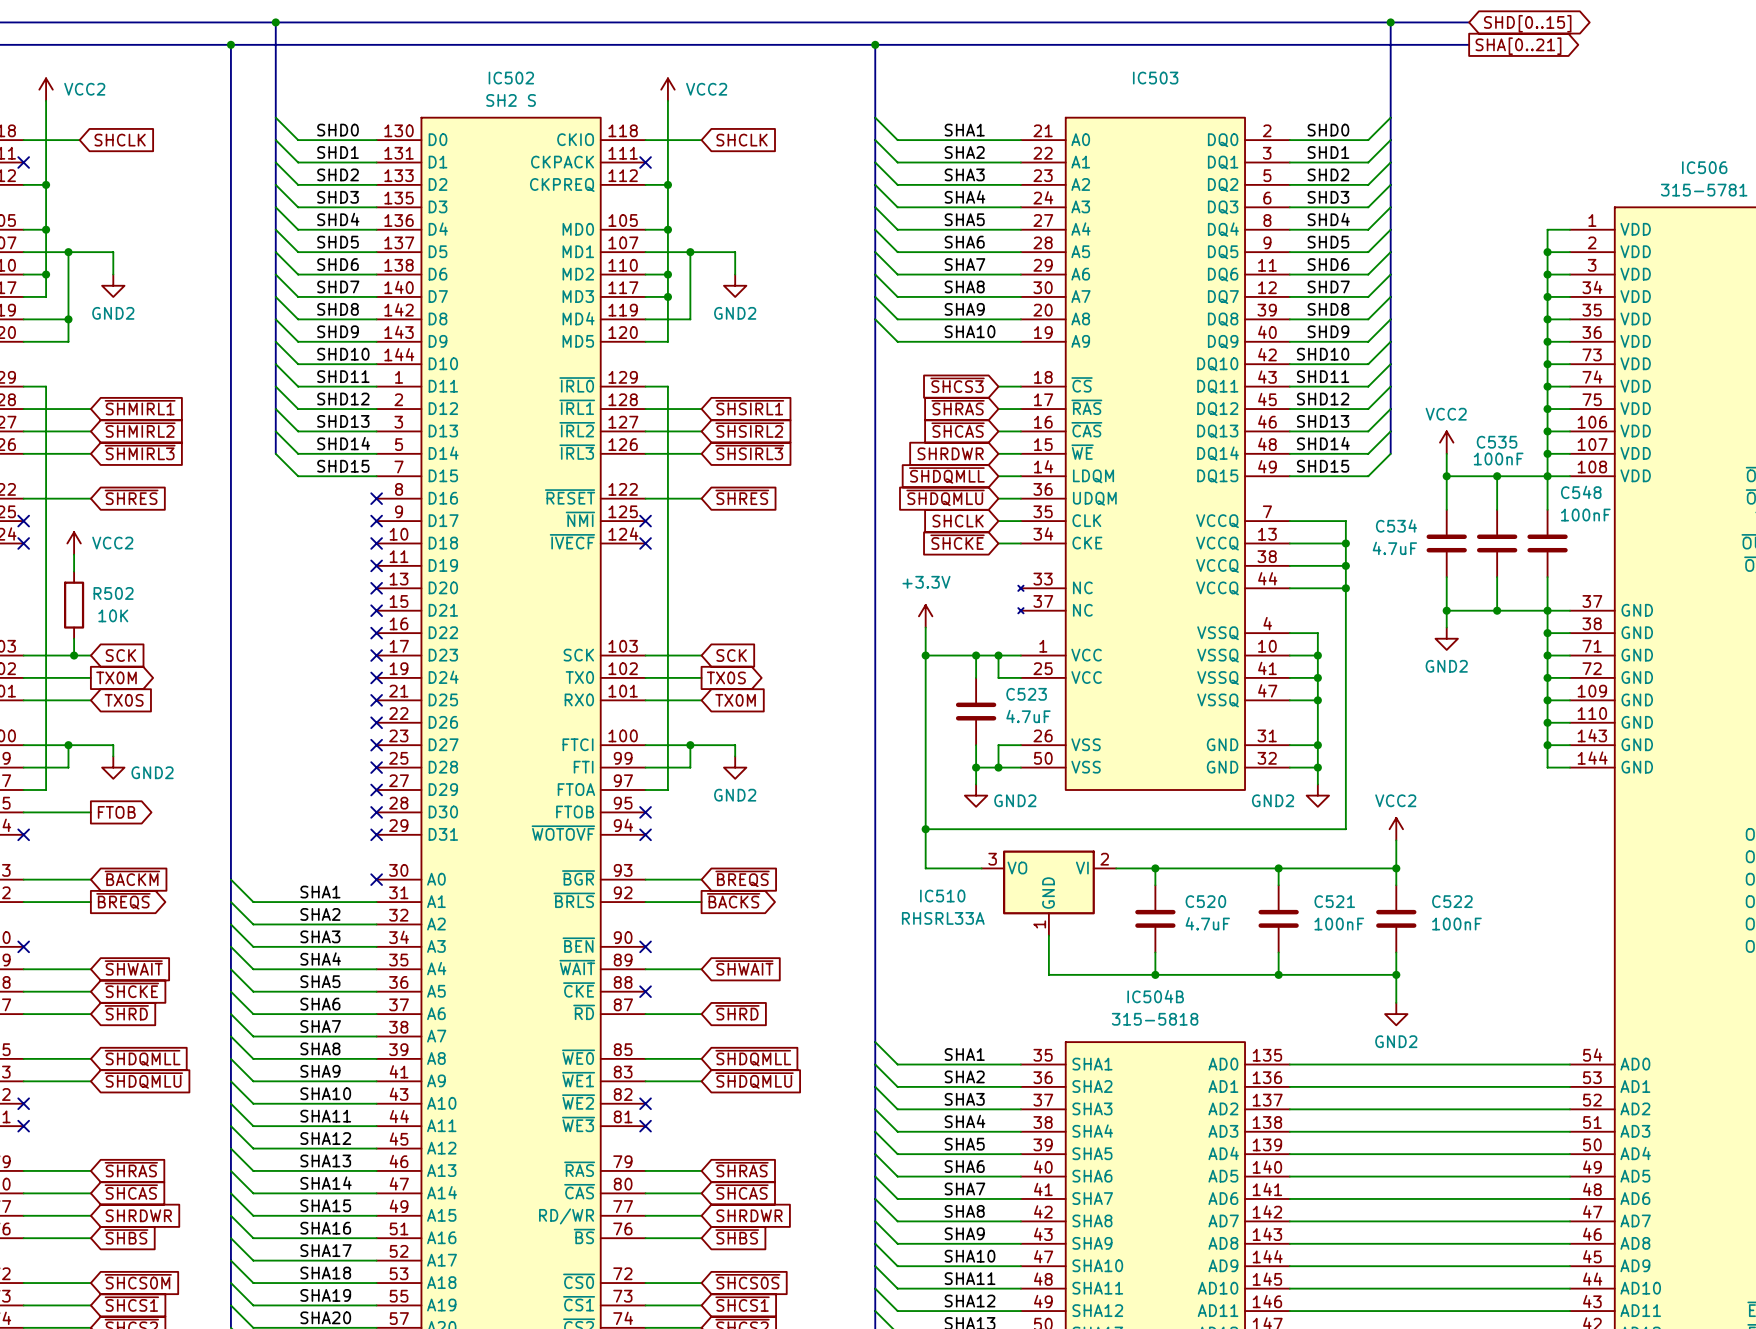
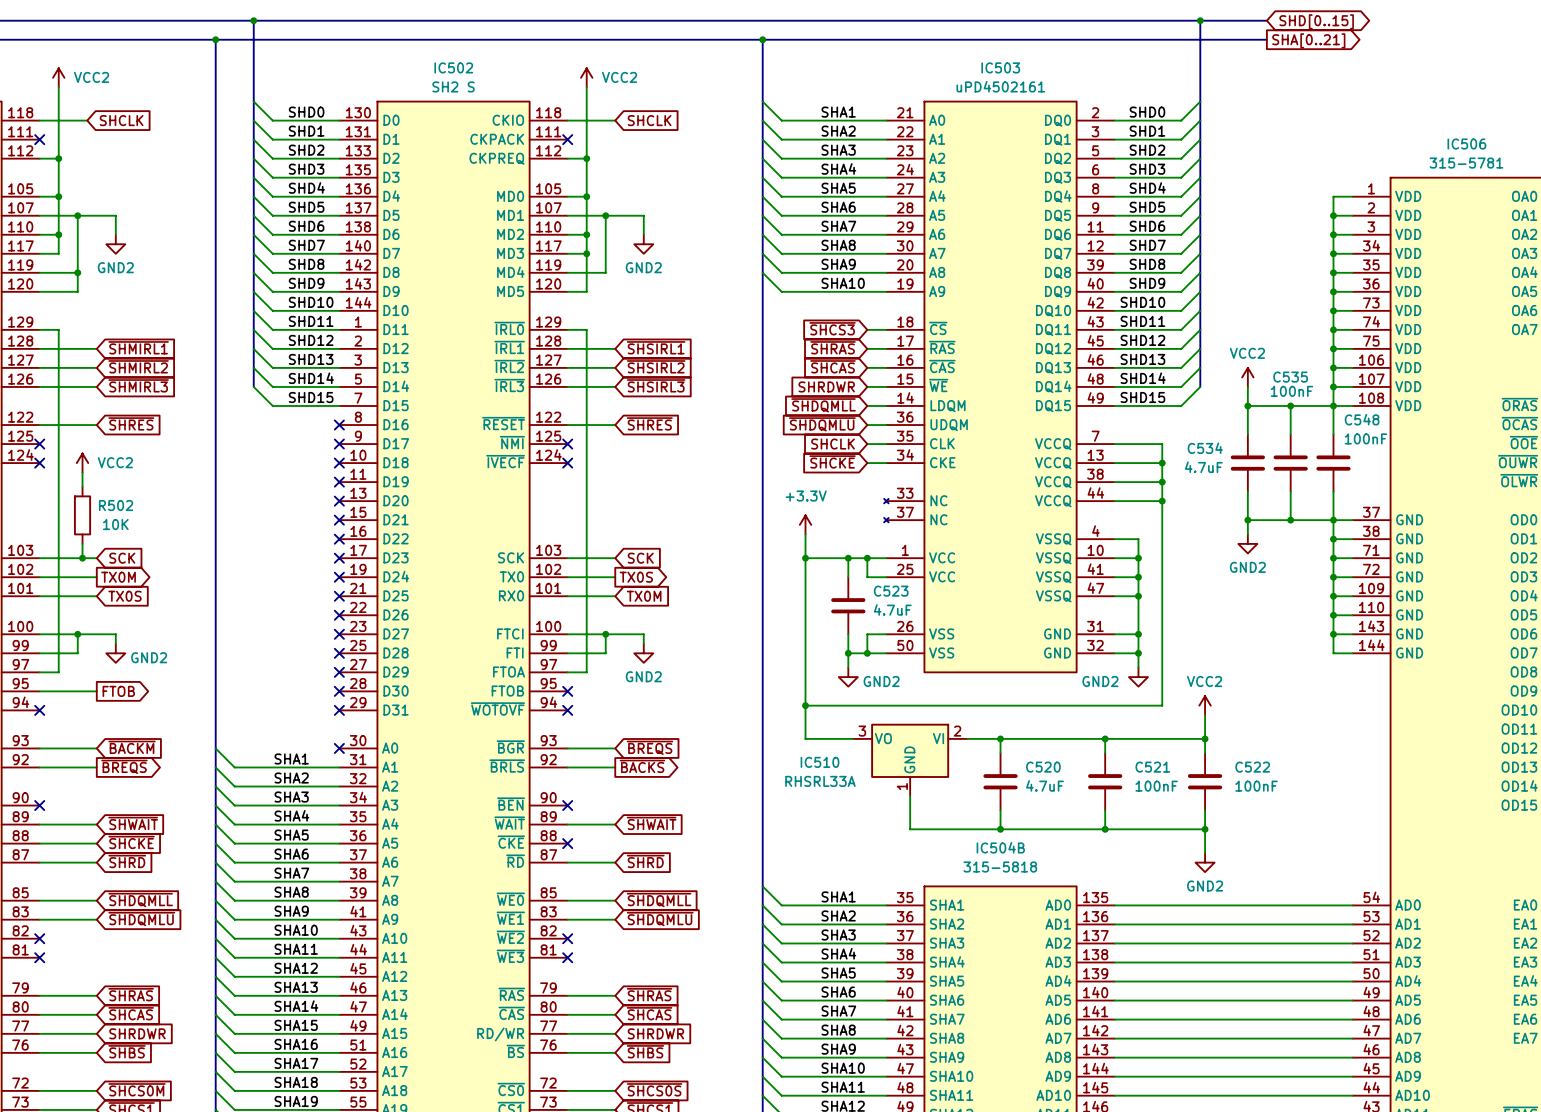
IC503 value: none -> uPD4502161 (1000, 86)

